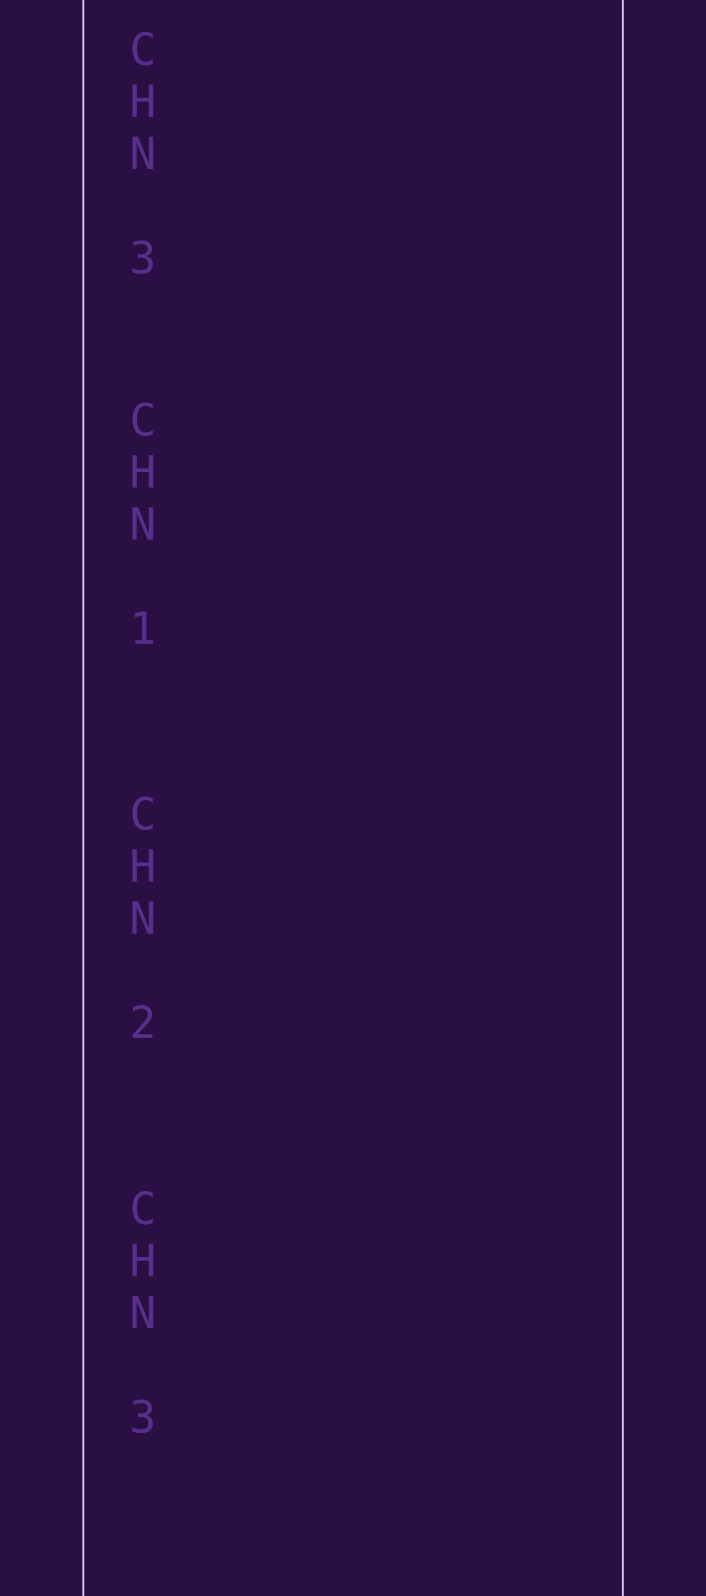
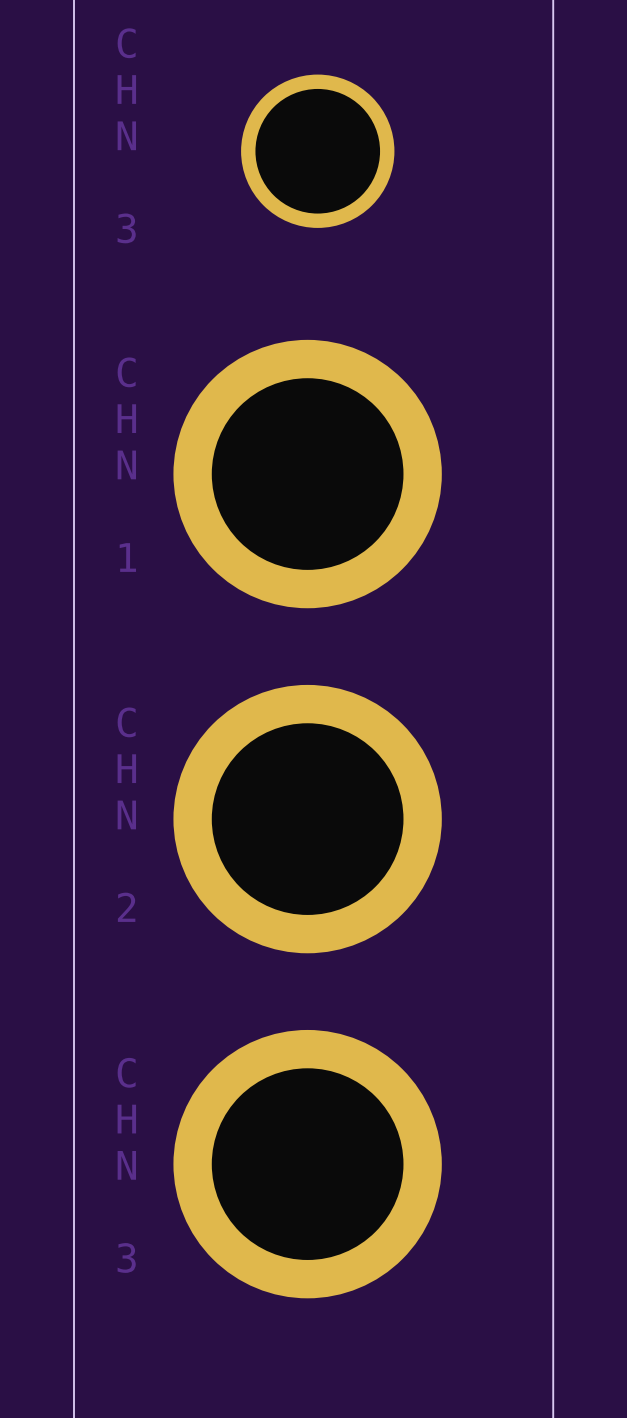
part: none -> (317, 151)
part: none -> (307, 474)
part: none -> (307, 819)
part: none -> (307, 1164)

